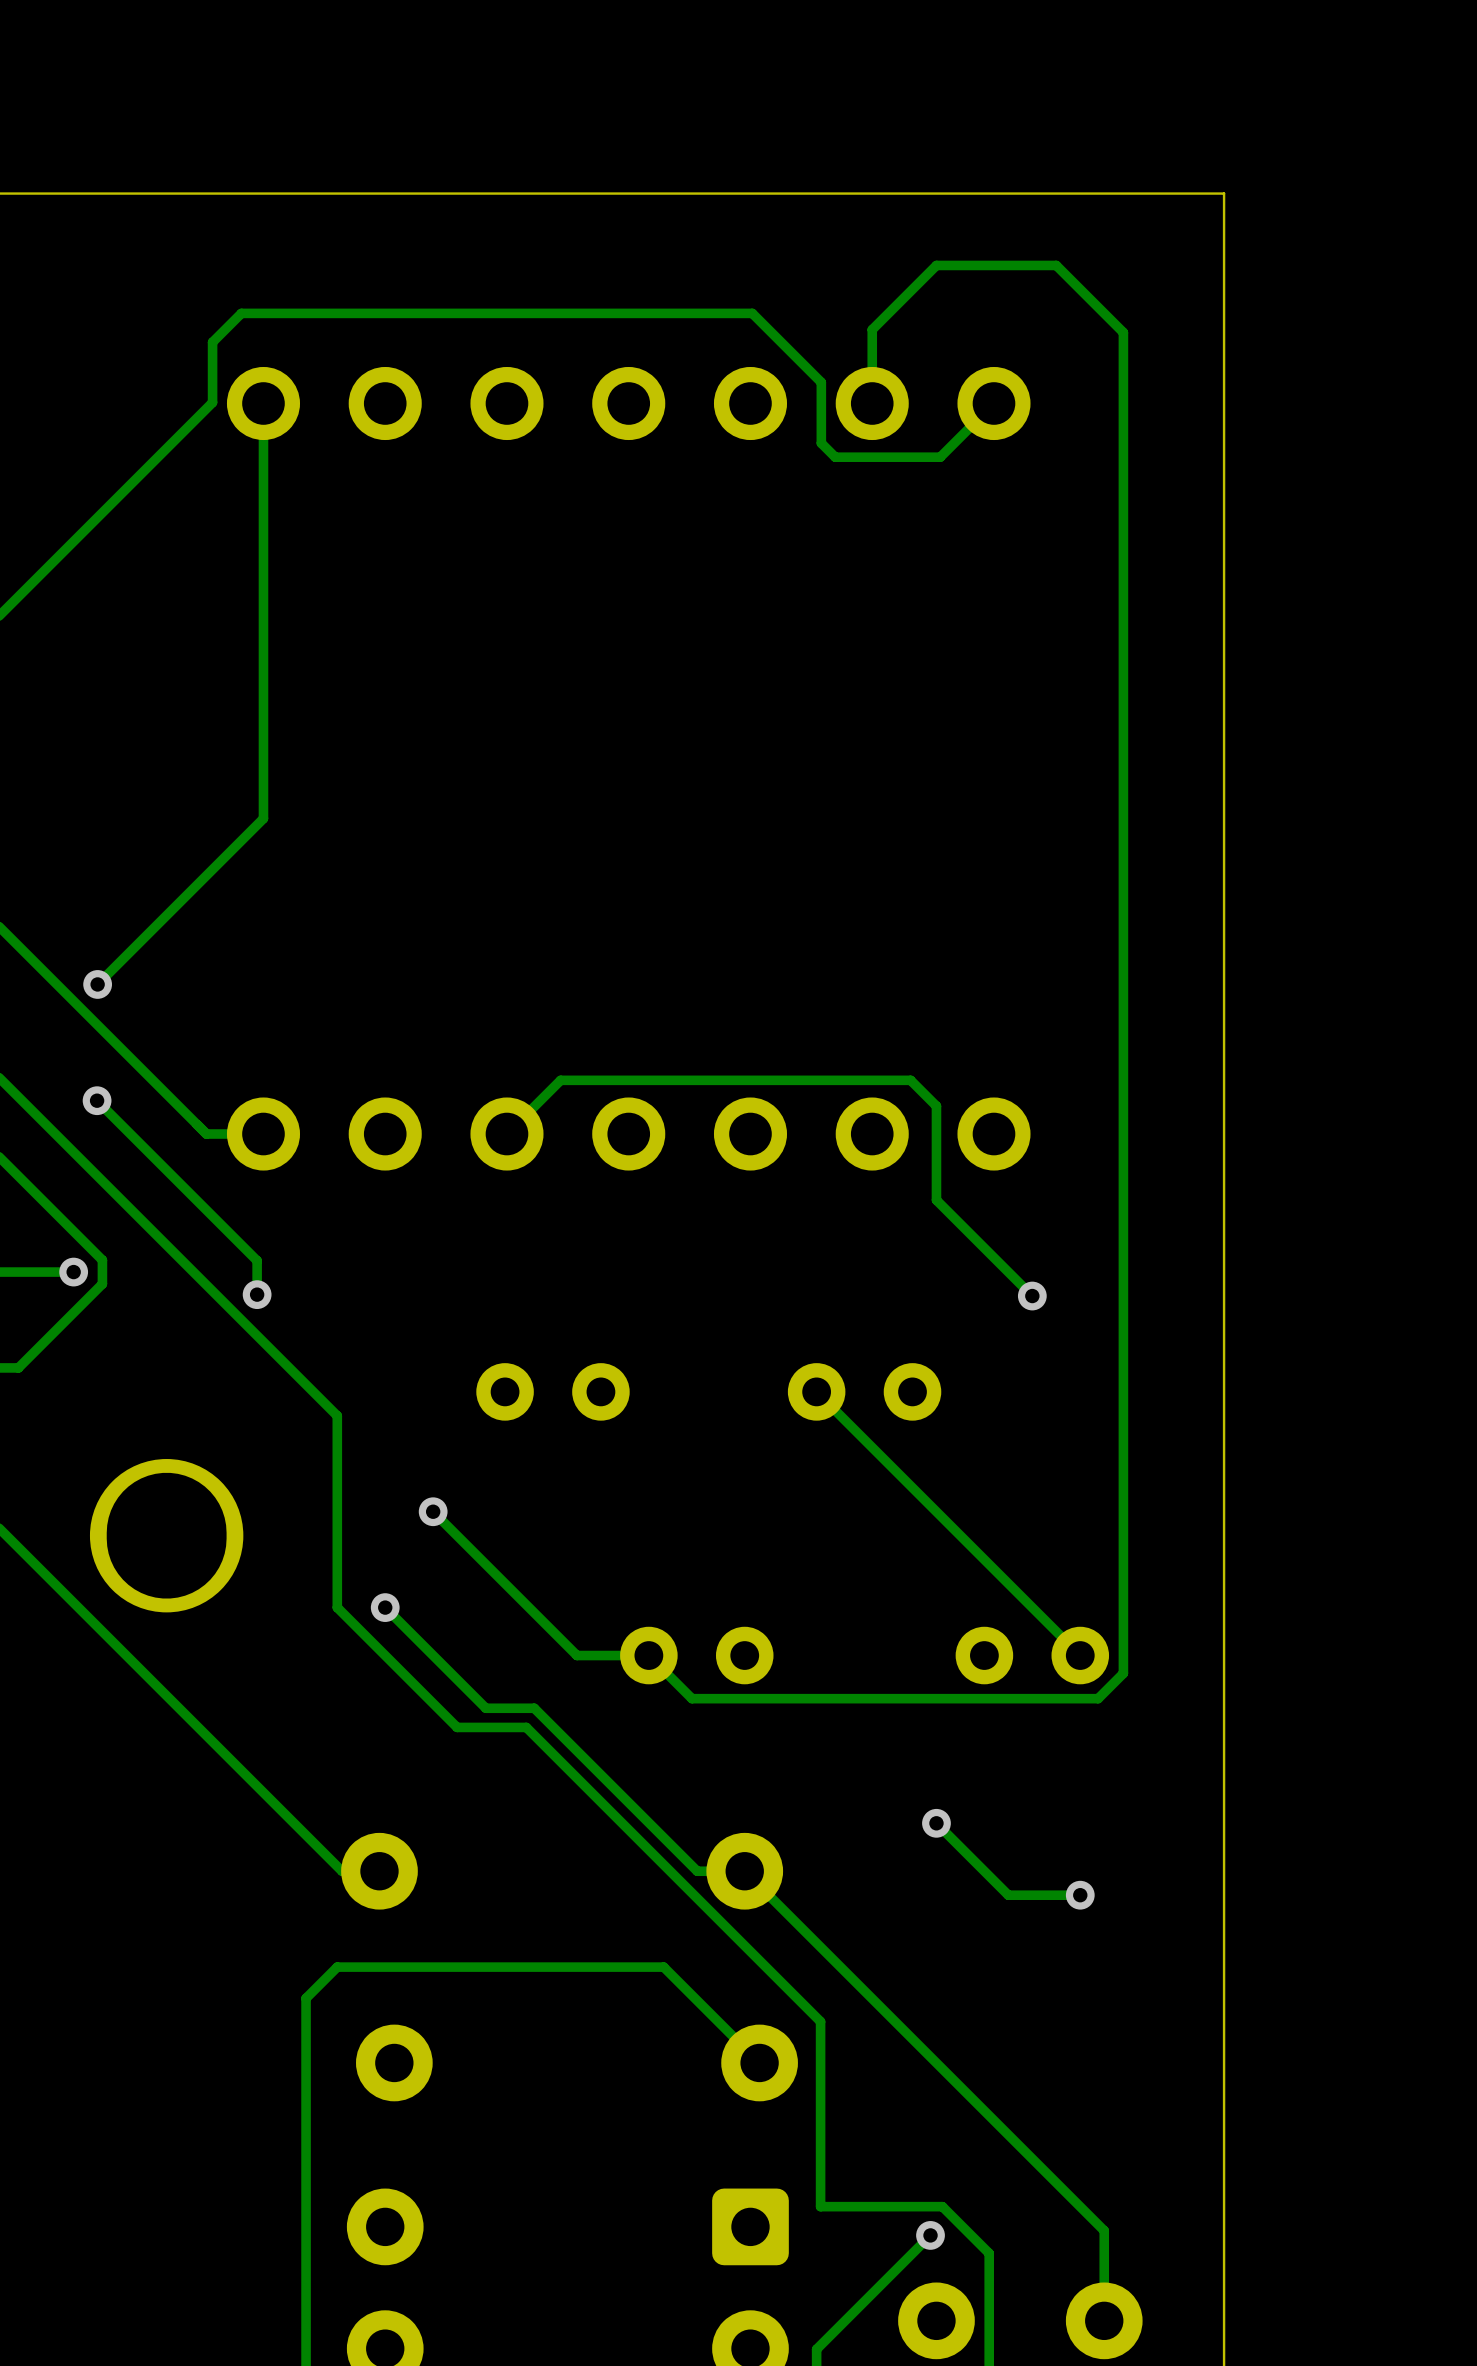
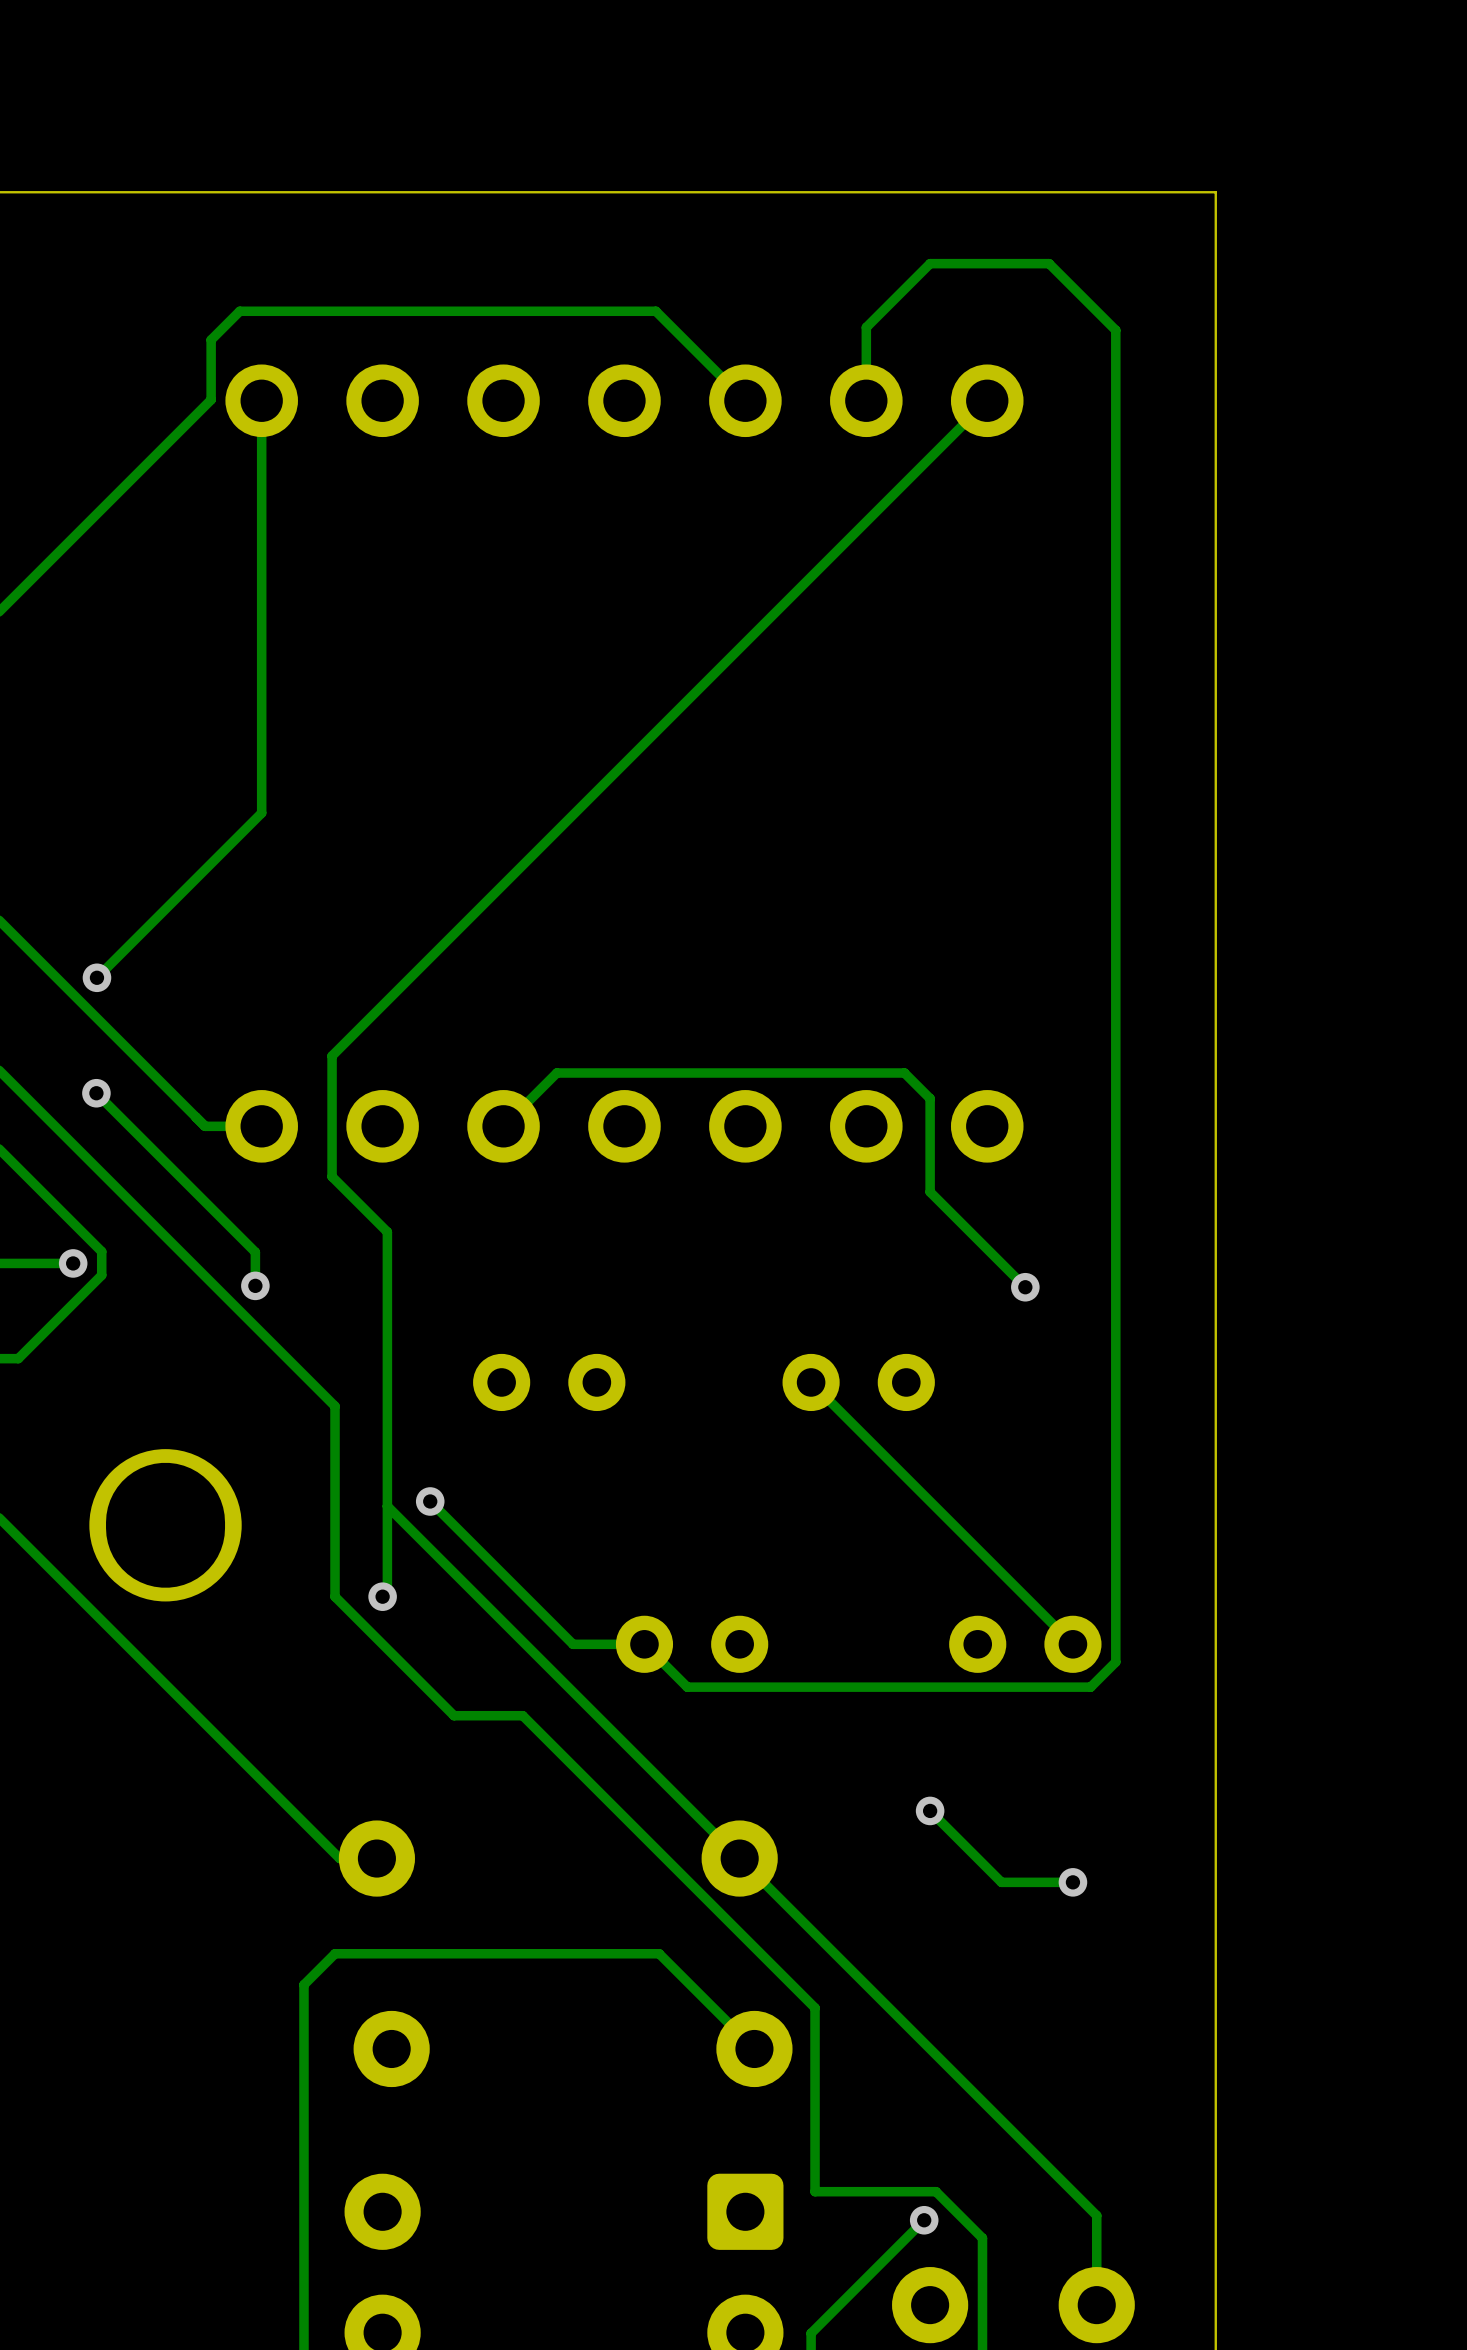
track: (660, 313) (752, 313) (821, 382) (821, 443) (835, 457) (940, 457) -> (655, 311) (745, 400)
track: none -> (933, 454) (332, 1055) (332, 1176) (387, 1232) (387, 1591)
track: (390, 1602) (390, 1612) (485, 1708) (534, 1708) (697, 1871) (744, 1871) -> (387, 1506) (739, 1858)

